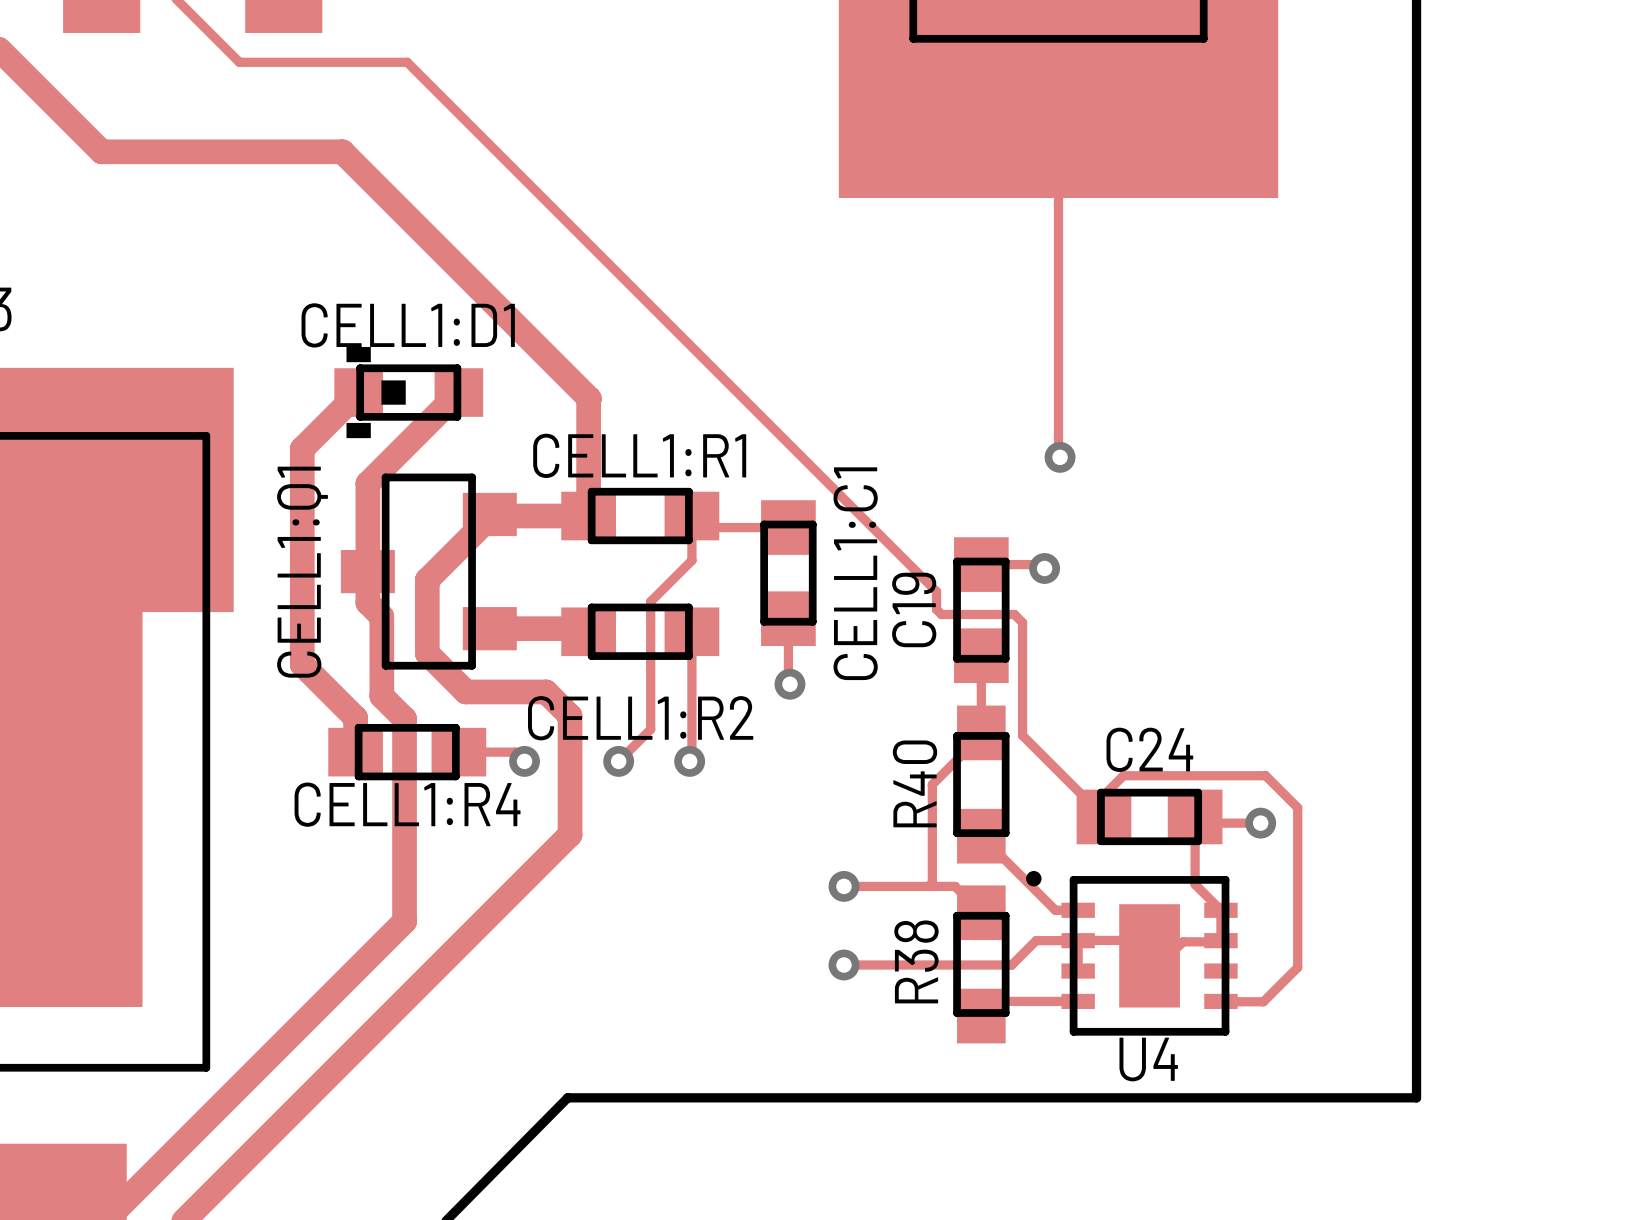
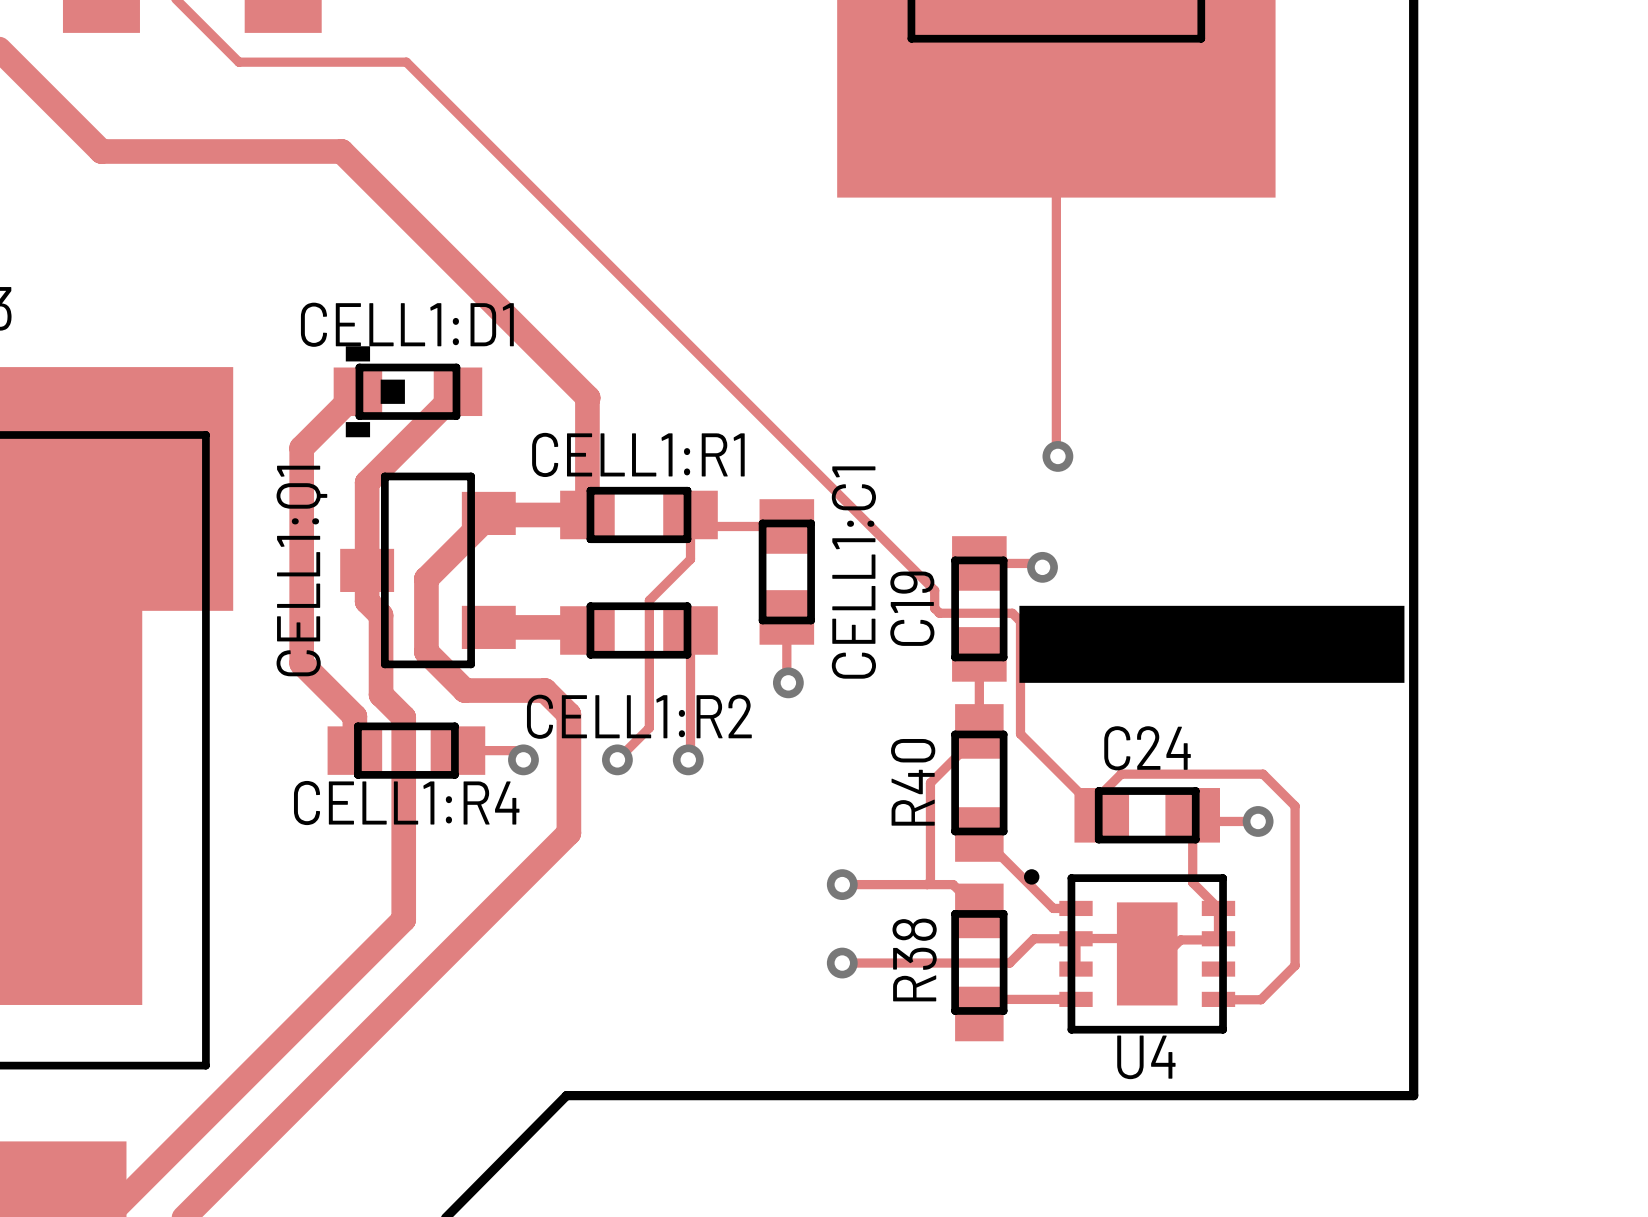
drawing: none -> [1019, 605, 1405, 683]

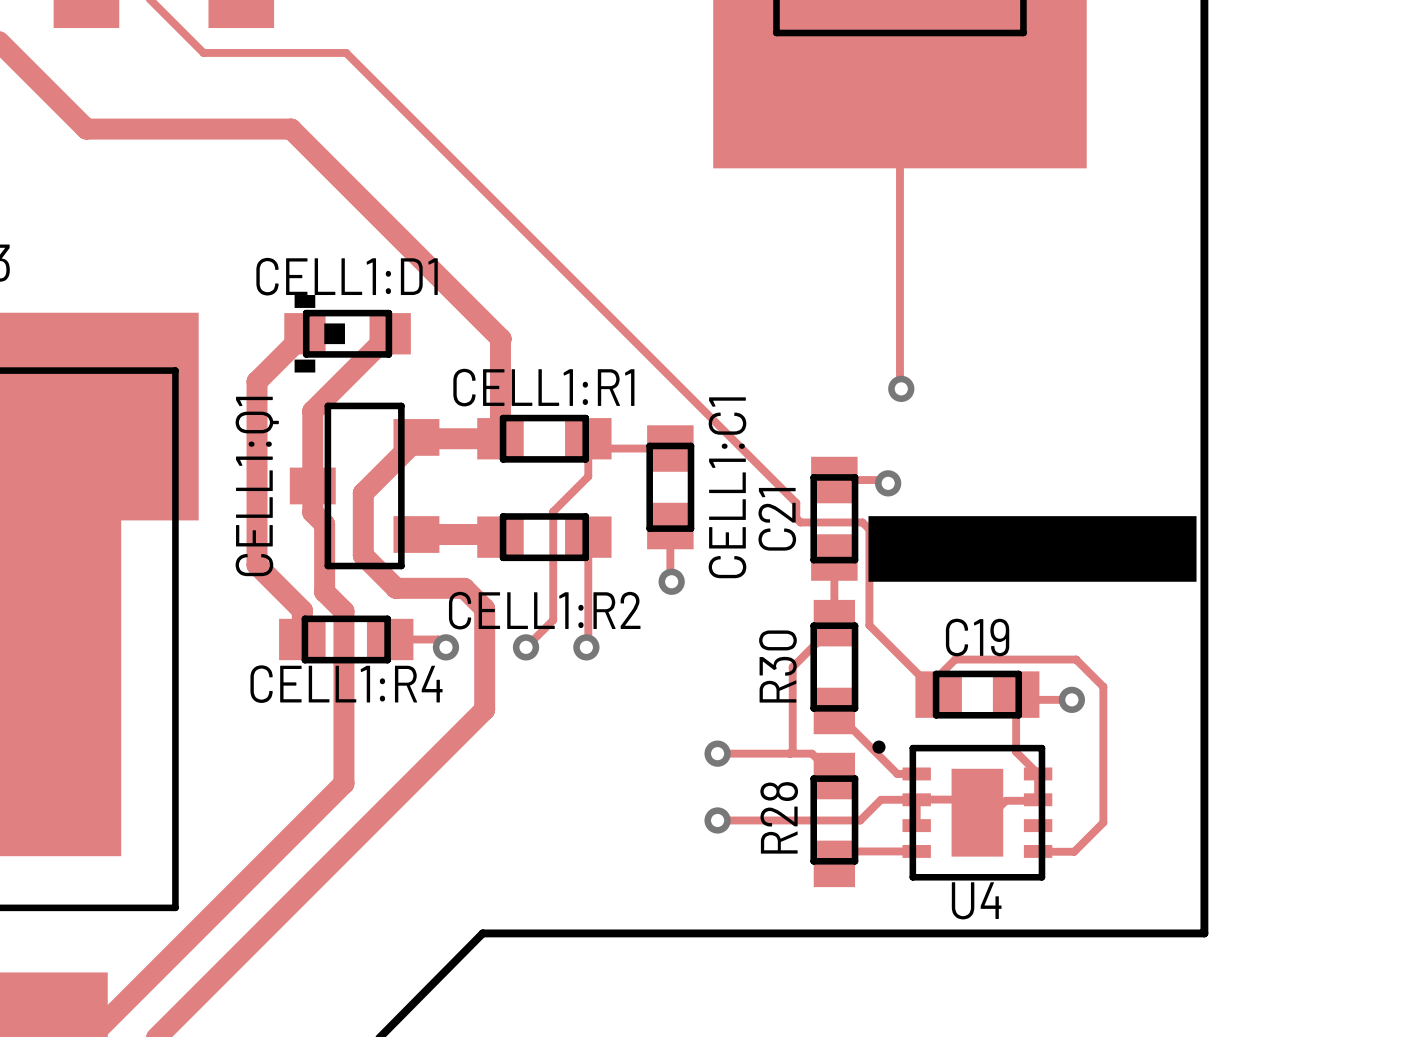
C19 name: C19 (912, 608) -> C21 (777, 519)
C24 name: C24 (1147, 748) -> C19 (977, 637)
R40 name: R40 (913, 782) -> R30 (777, 666)
R38 name: R38 (914, 959) -> R28 (779, 817)

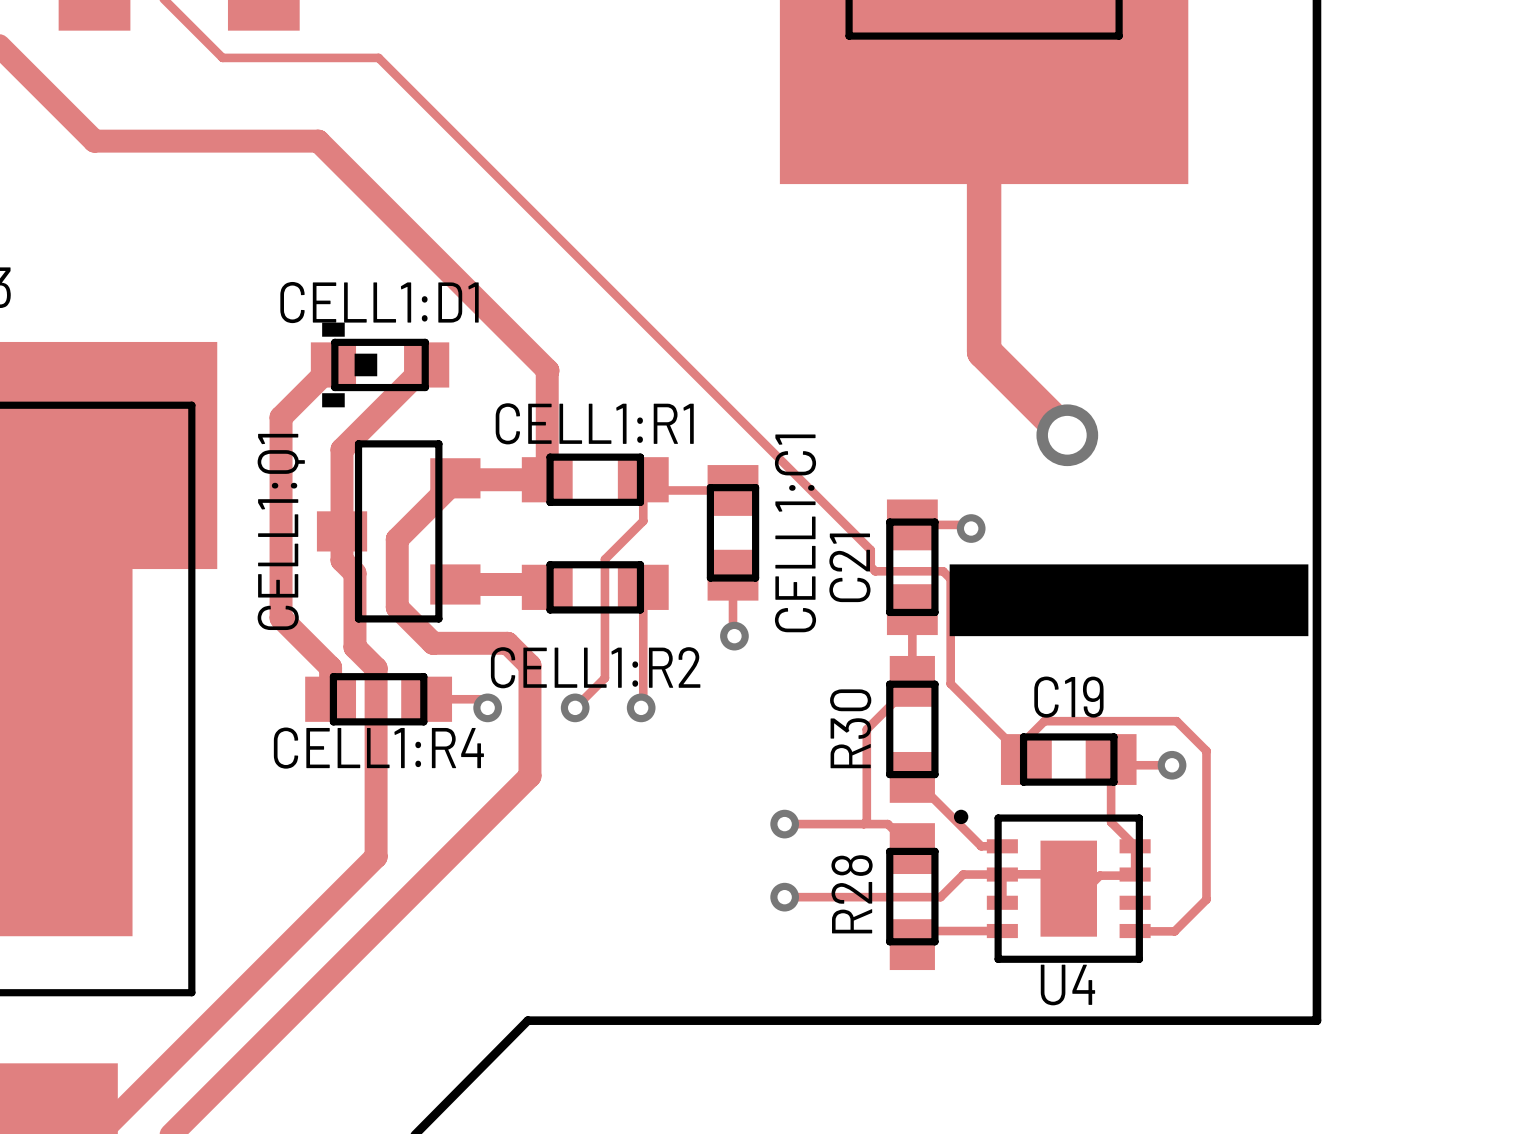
track width: thin (899, 23) (899, 321) -> thick (984, 25) (984, 351)
track: (899, 321) (901, 388) -> (984, 351) (1067, 434)
via: (901, 388) -> none
via: none -> (1067, 435)

